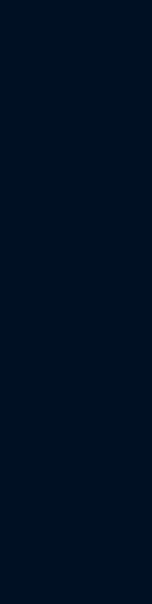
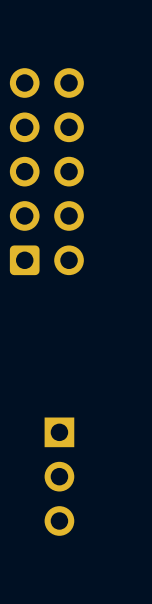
part: none -> (46, 171)
part: none -> (59, 476)

